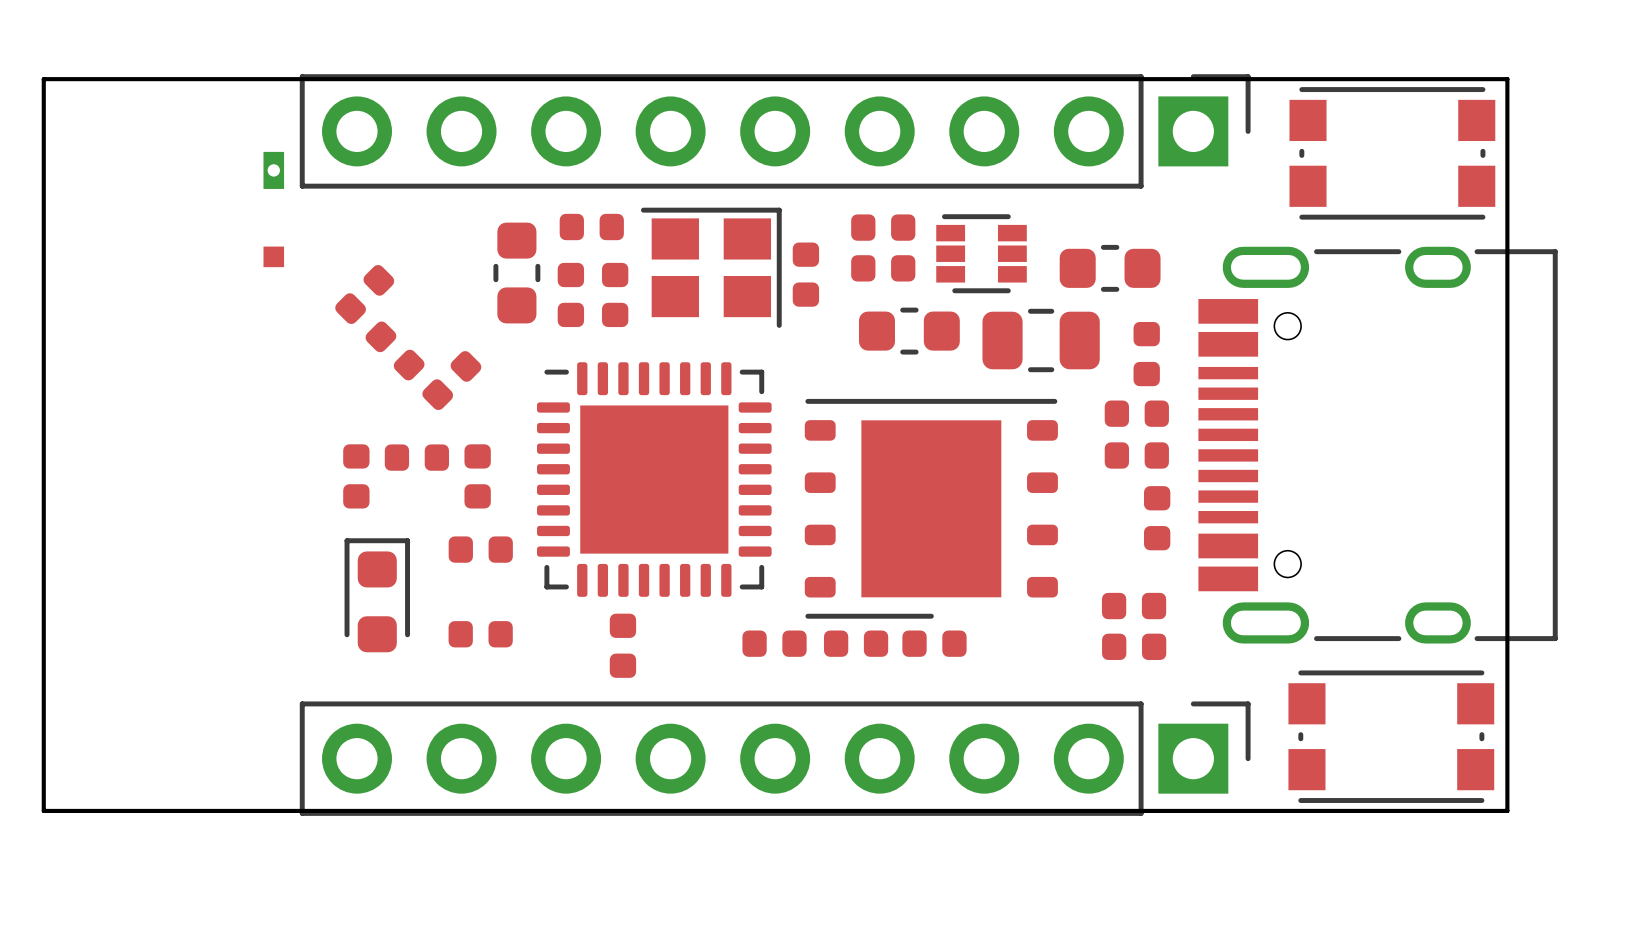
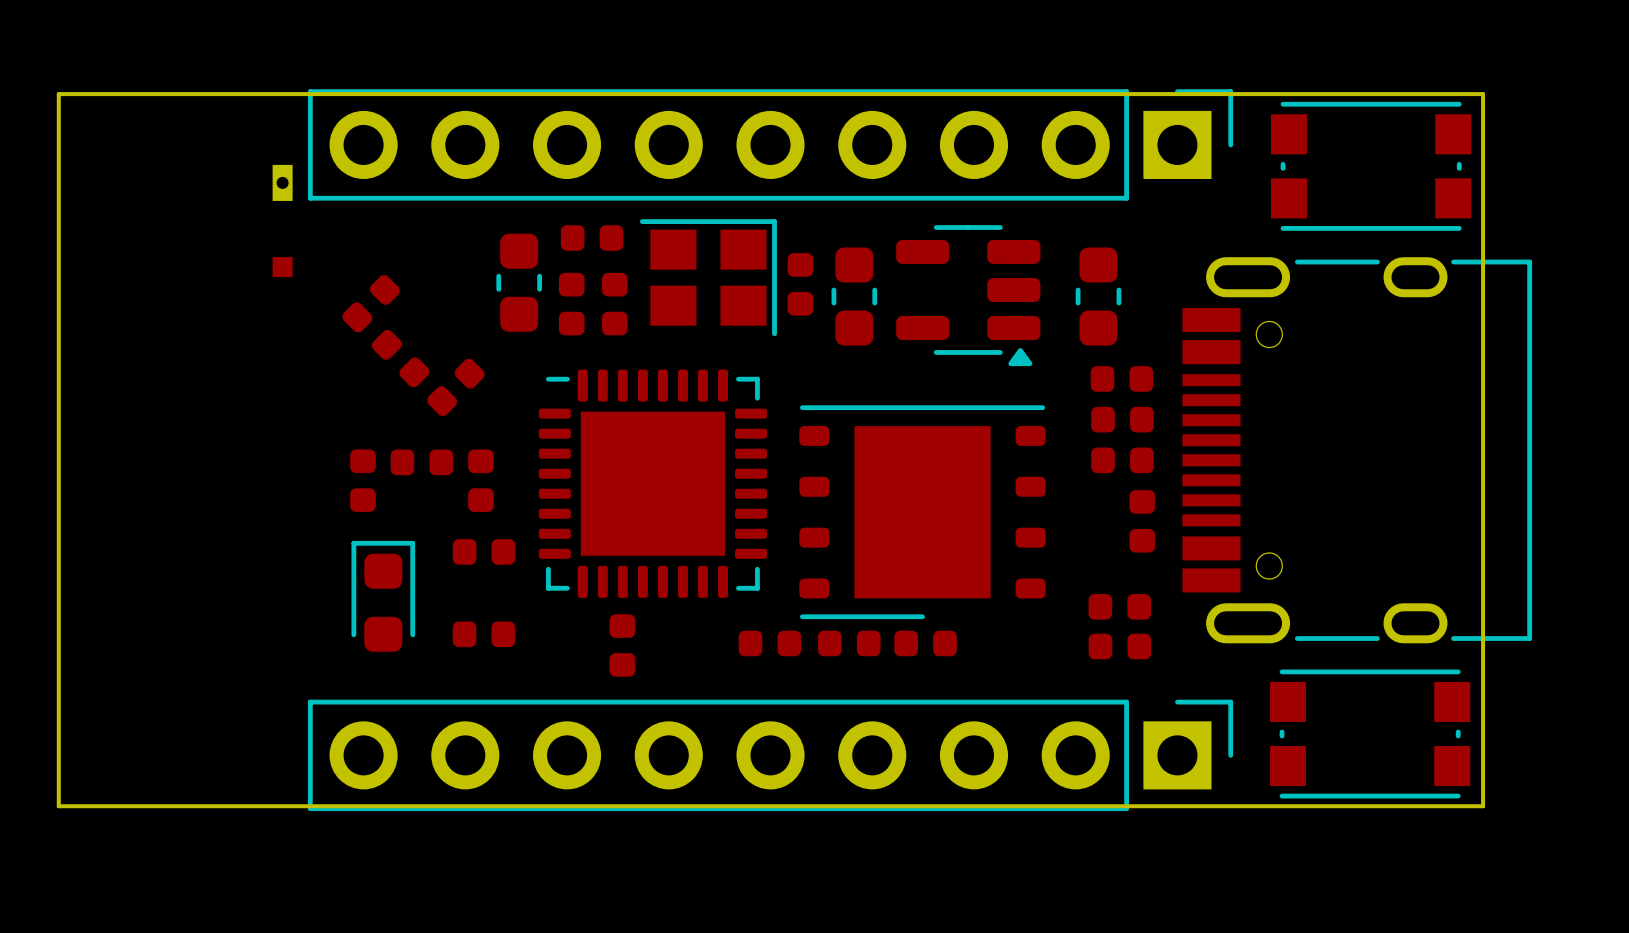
part footprint: [936, 214, 1027, 294] -> [896, 225, 1041, 367]
part: (883, 227) -> none
part footprint: [851, 255, 916, 282] -> [831, 247, 878, 346]
part rotation: 0° (1110, 268) -> 90° clockwise (1098, 296)
part: (909, 331) -> none
part: (1041, 340) -> none
part rotation: 0° (1146, 354) -> 90° clockwise (1121, 378)

